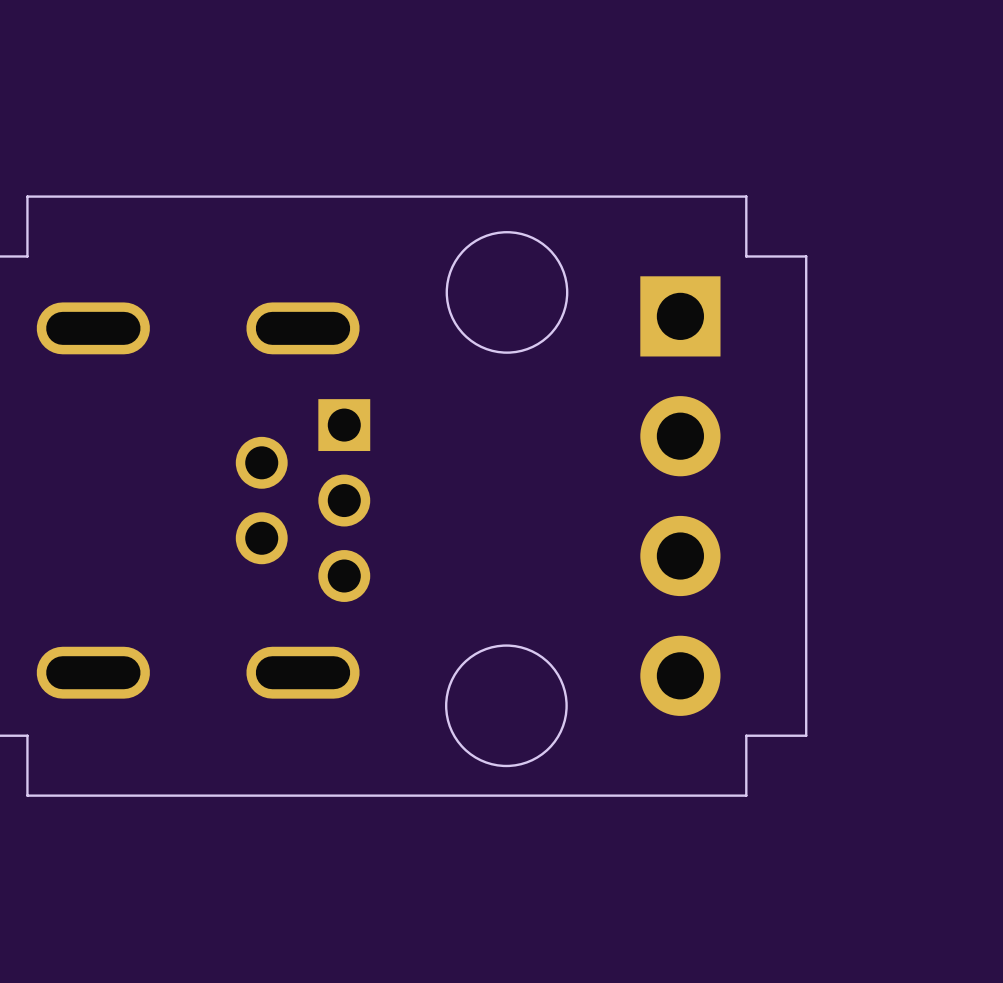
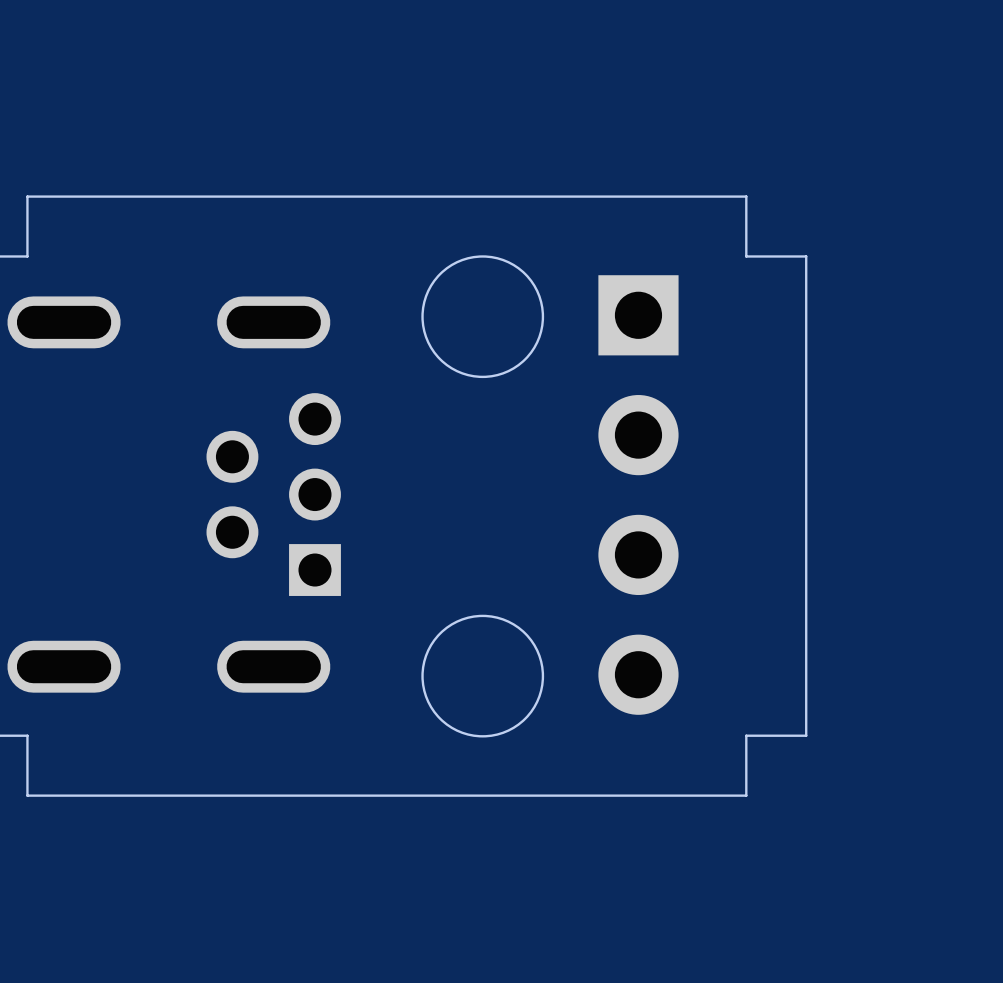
round board edge position: (506, 292) -> (482, 316)
part footprint: [36, 302, 371, 699] -> [7, 296, 341, 693]
part position: (680, 496) -> (638, 495)
round board edge position: (506, 705) -> (482, 676)

